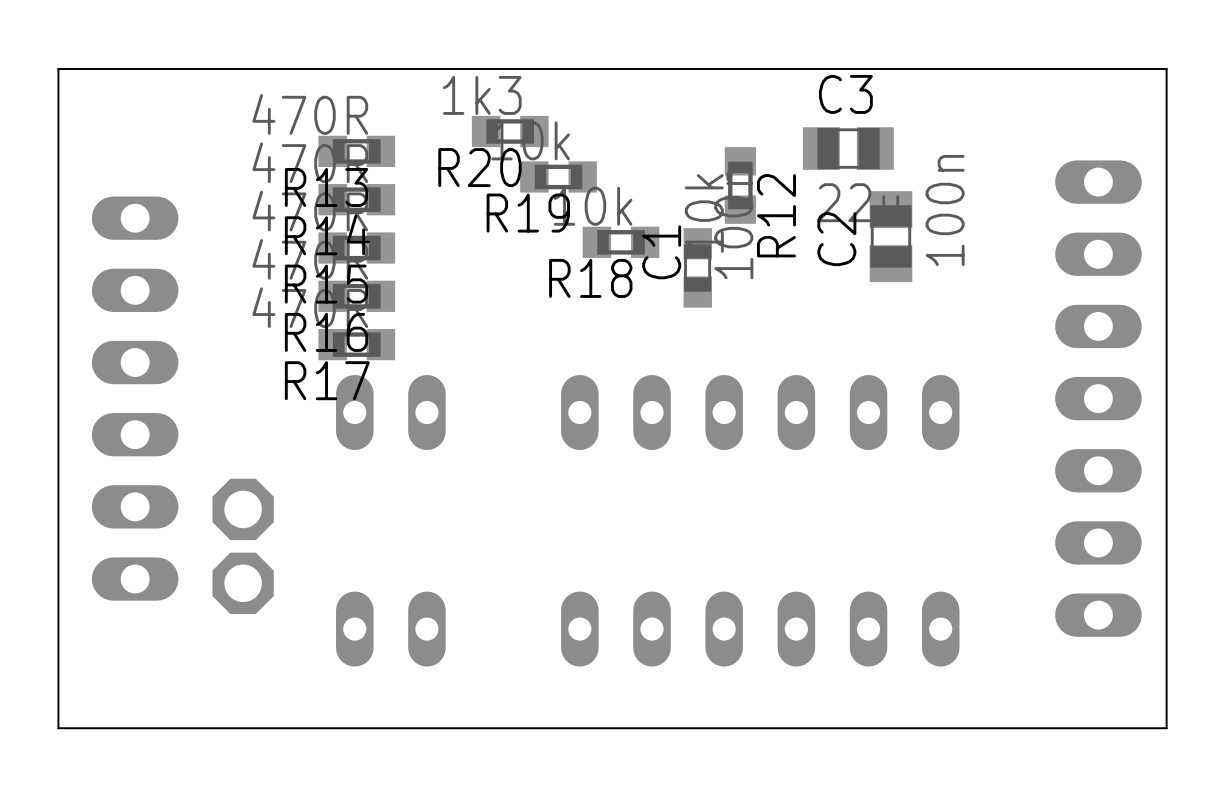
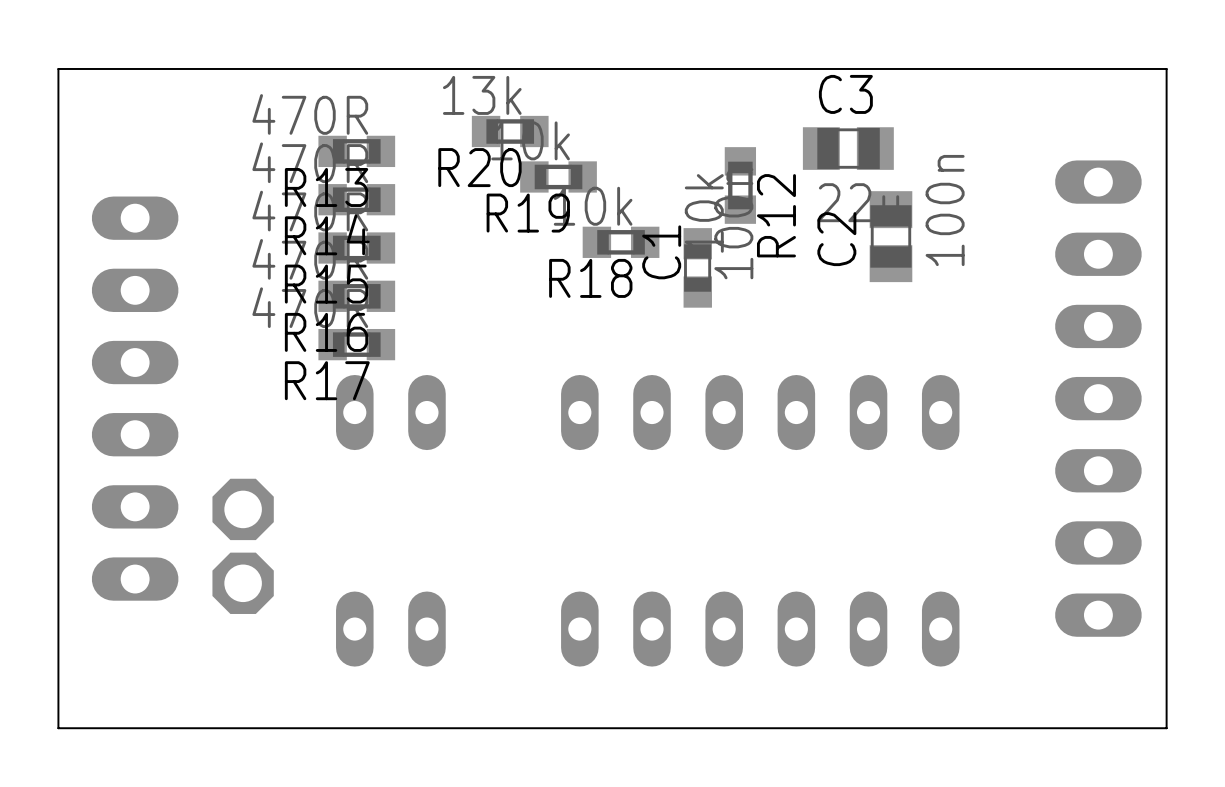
R20 value: 1k3 (482, 95) -> 13k (482, 95)

